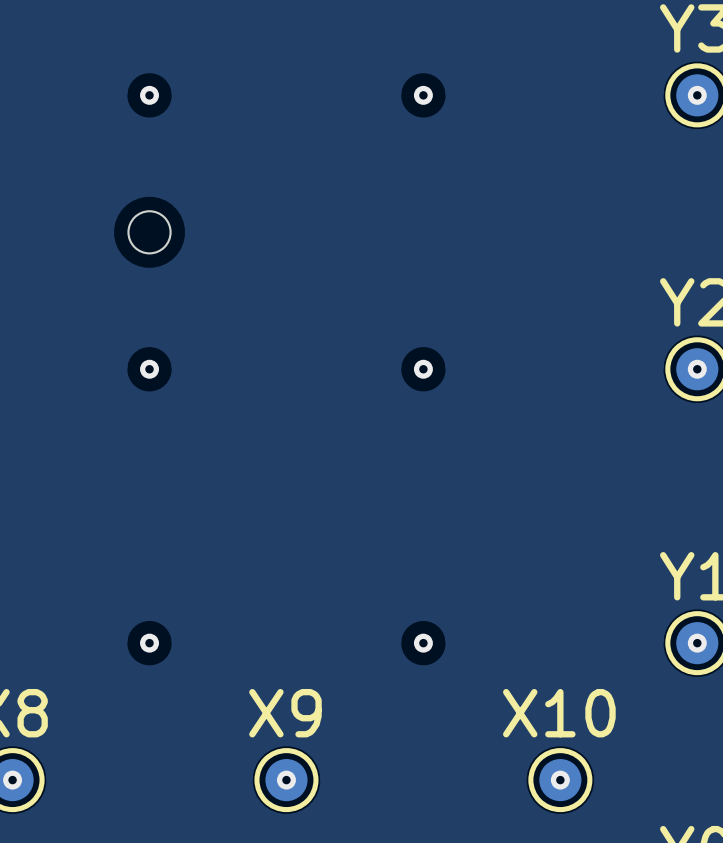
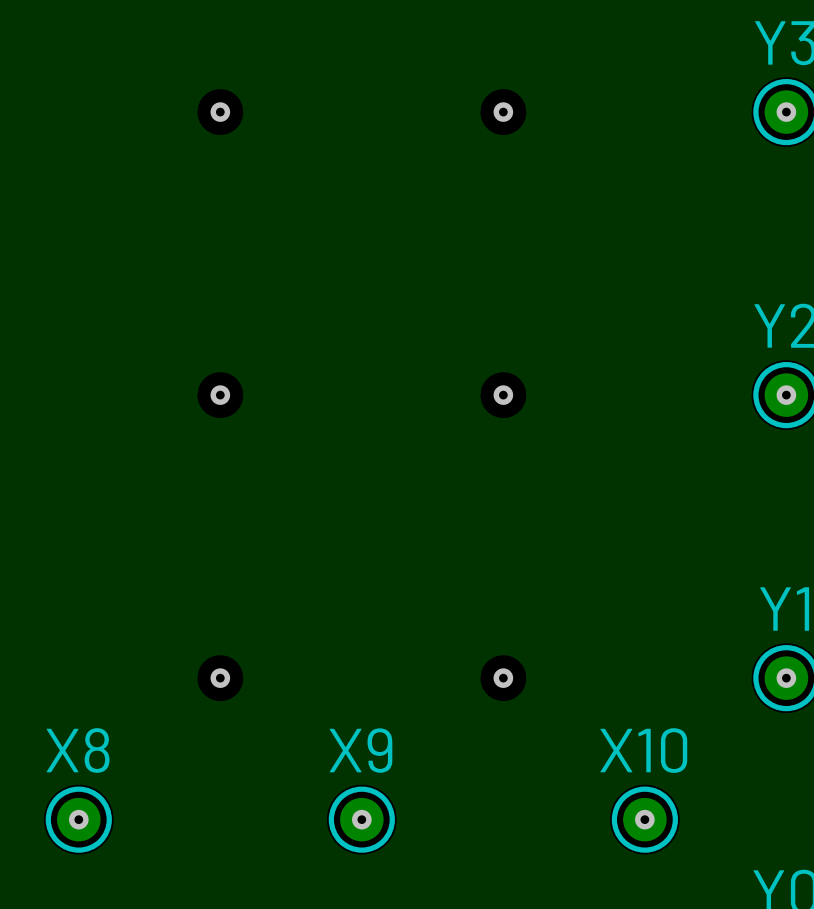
round board edge: [127, 210, 172, 255] -> none

